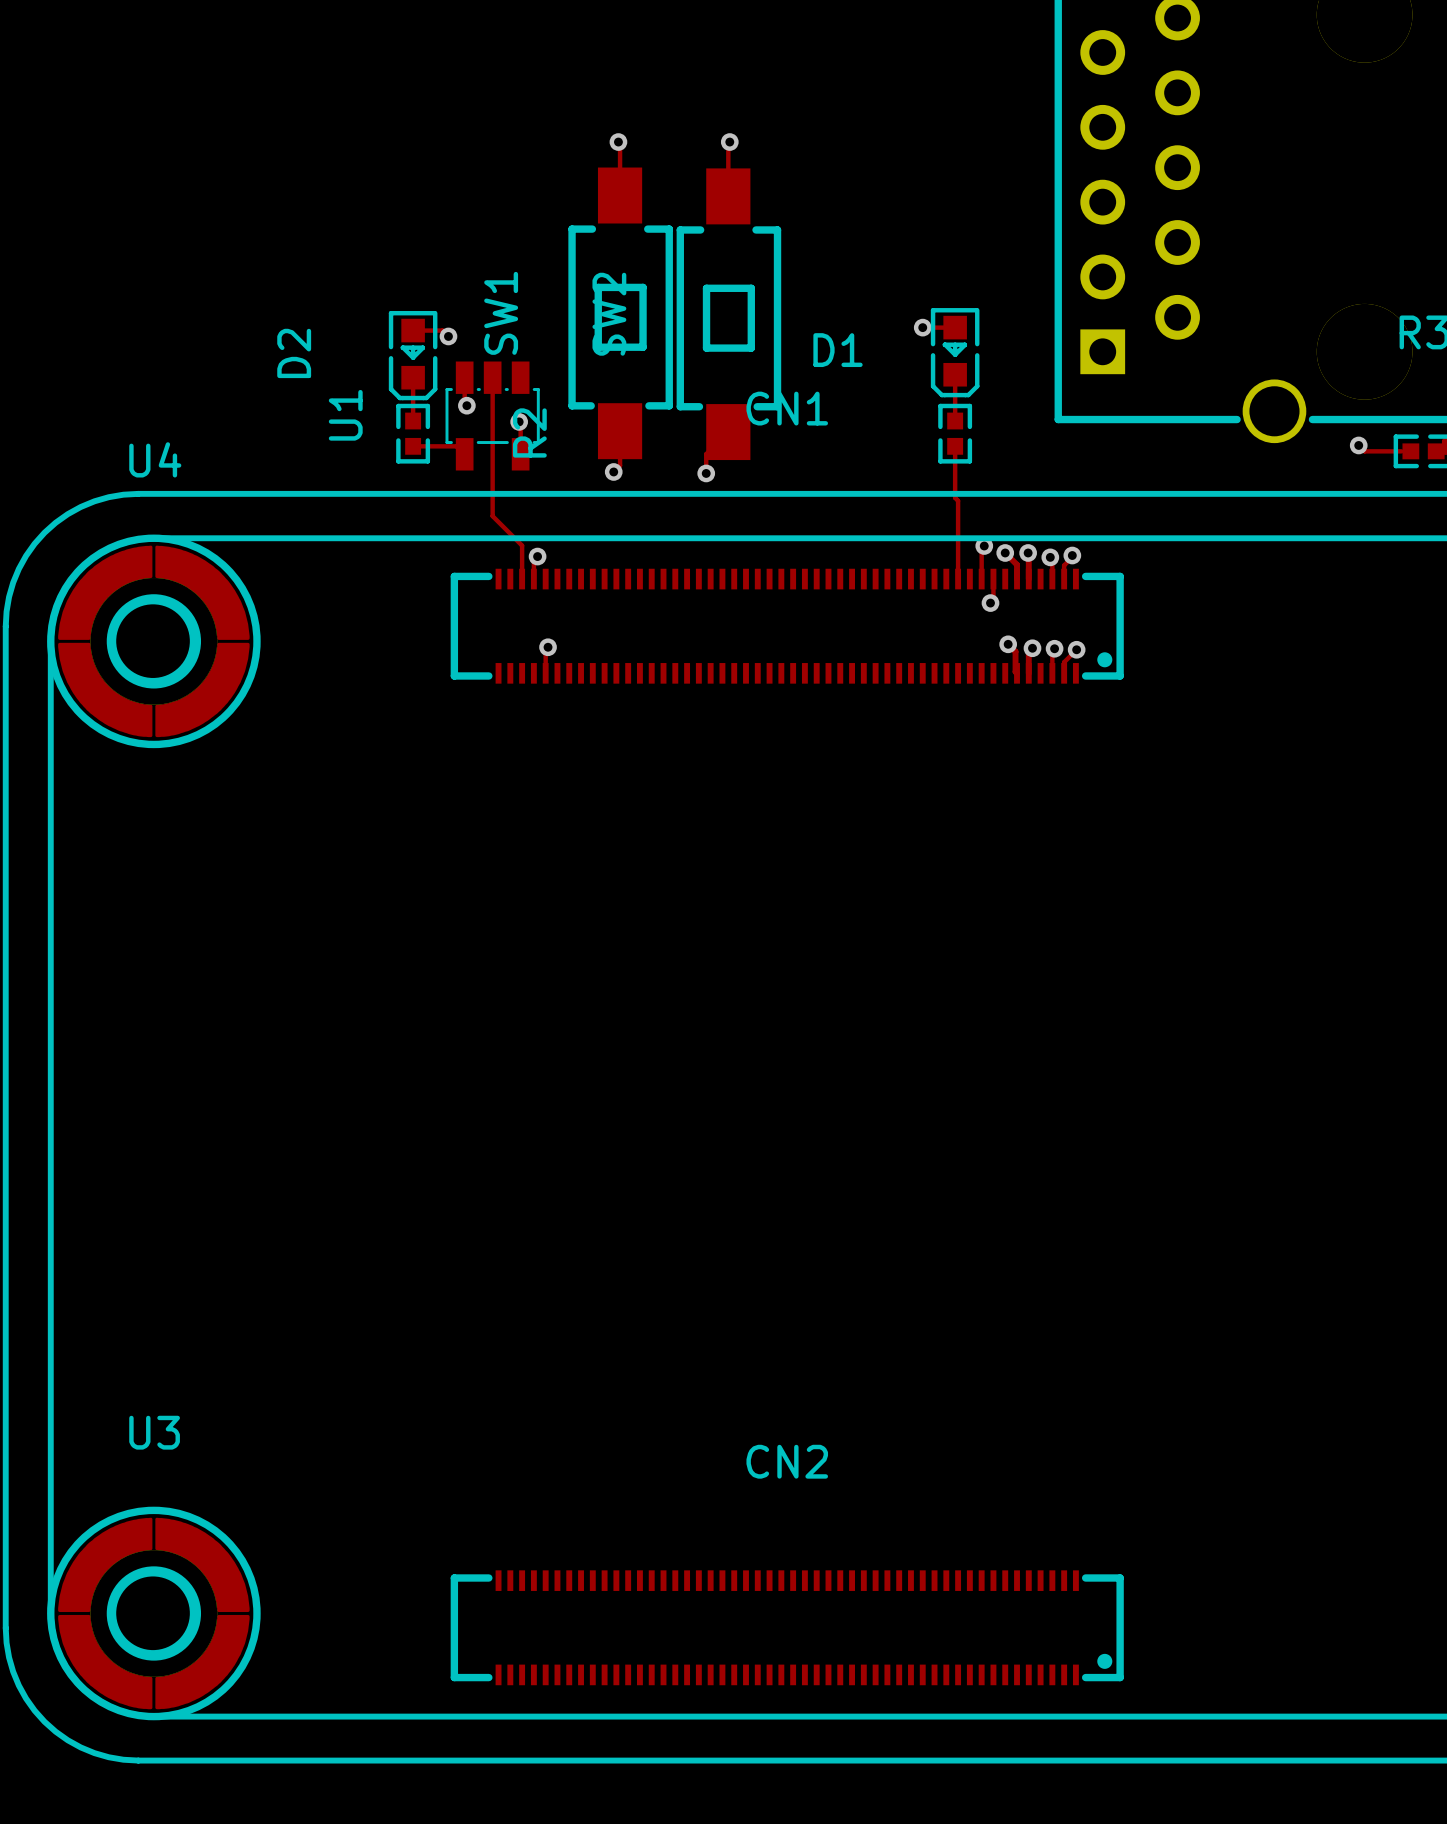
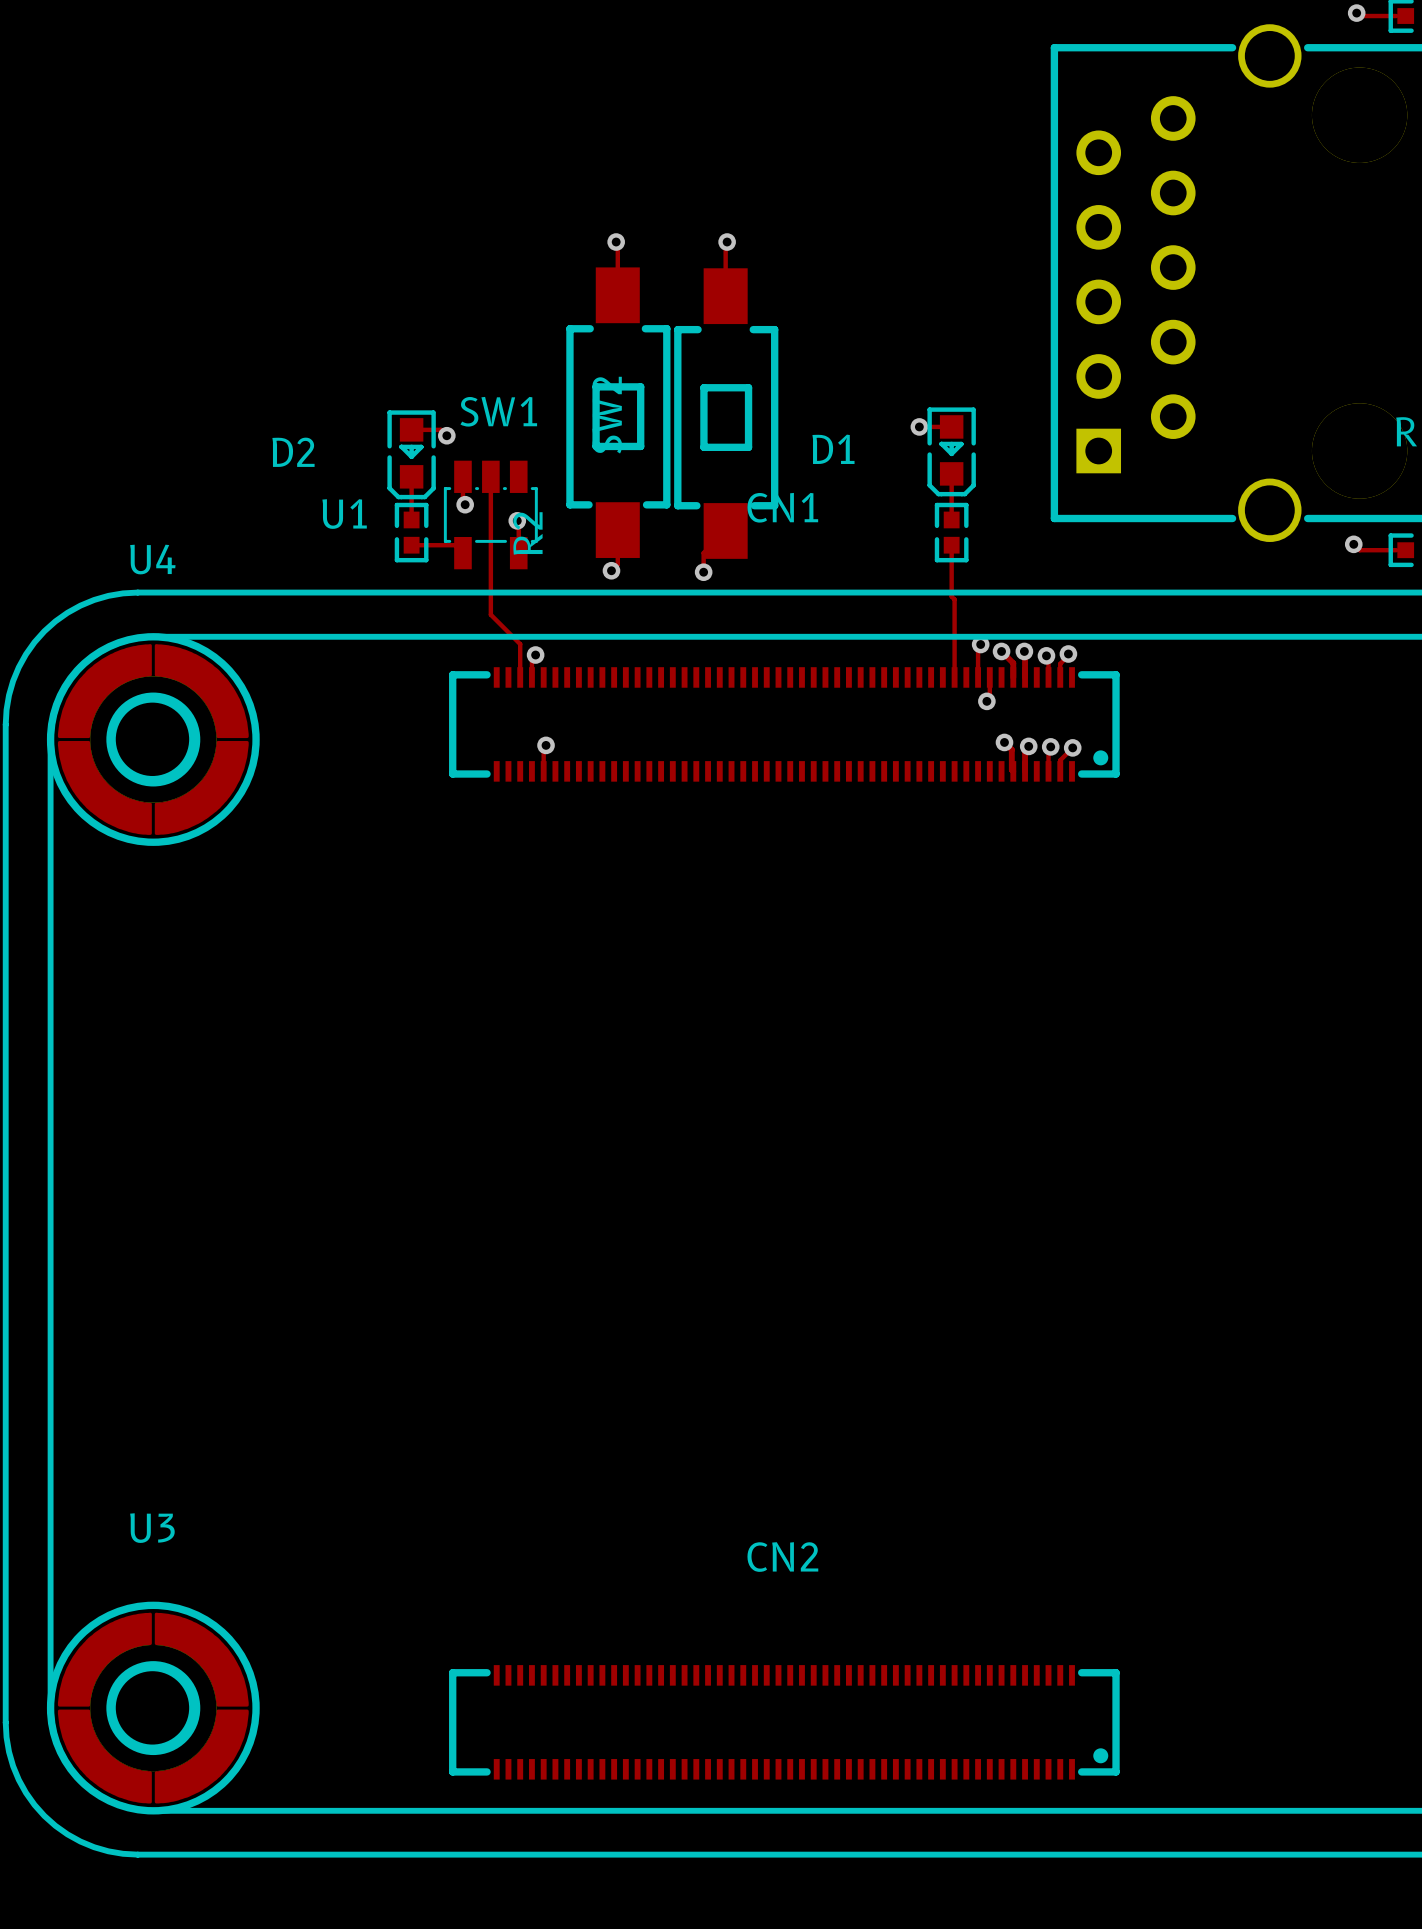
SW1 name rotation: 0° (501, 313) -> 90° clockwise (498, 411)
D2 name rotation: 0° (294, 353) -> 90° clockwise (293, 452)
U1 name rotation: 0° (345, 415) -> 90° clockwise (344, 514)

